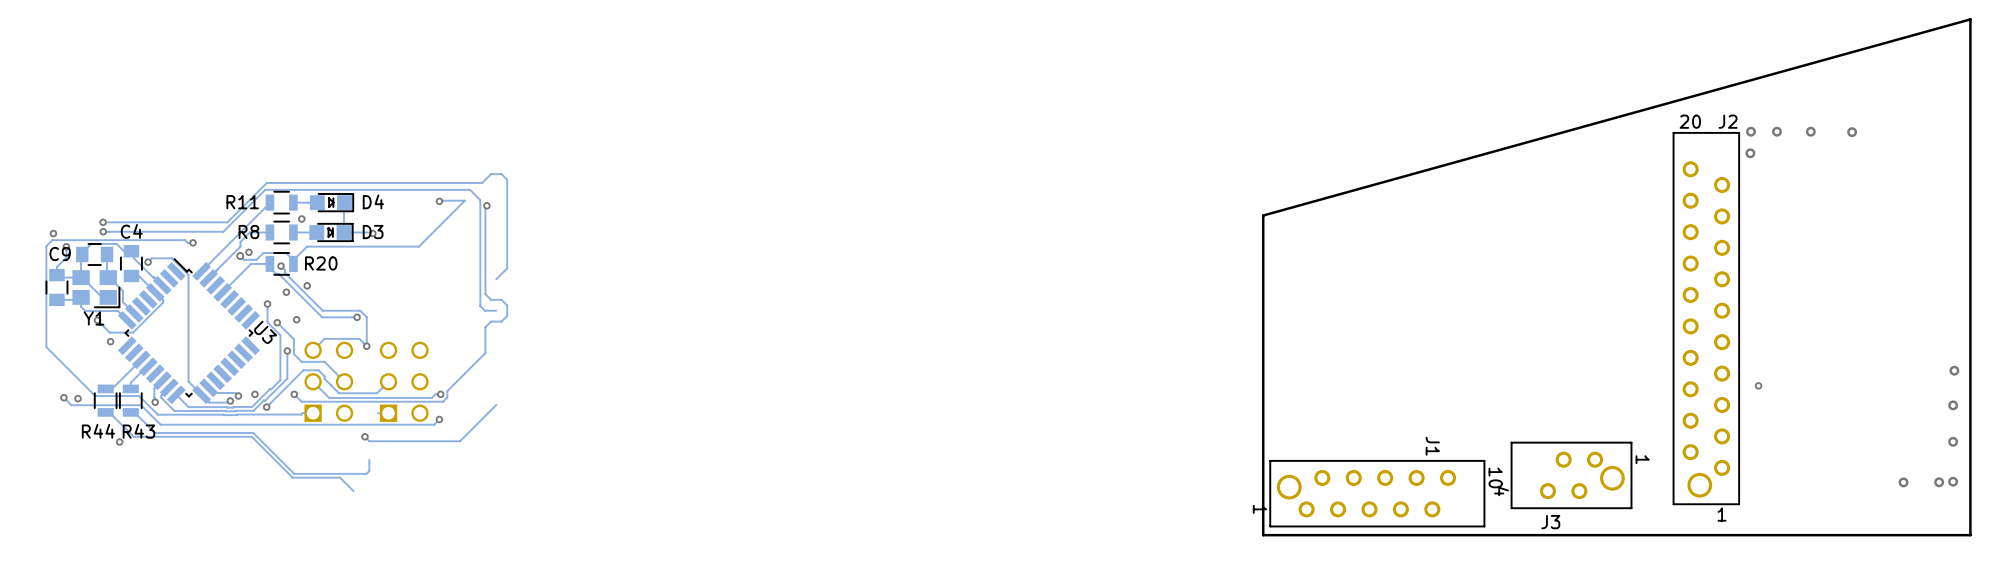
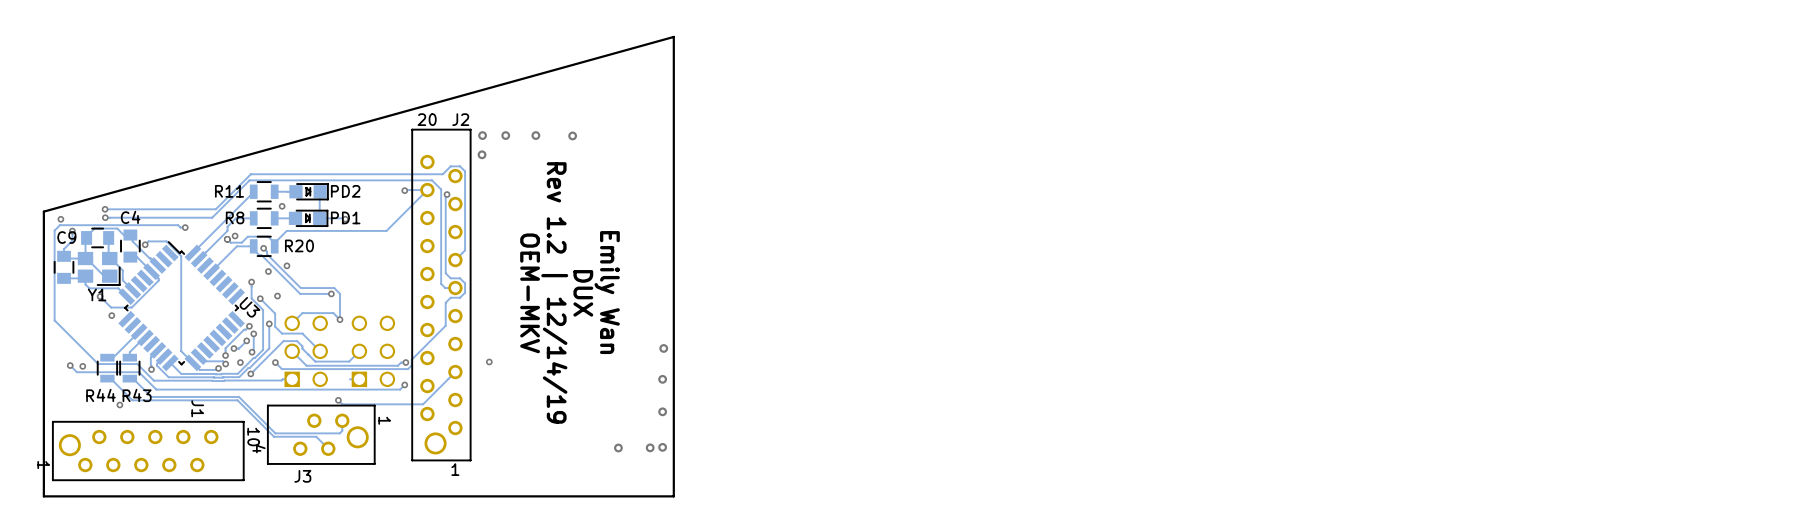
board edge: (1970, 19) (1263, 215) (1263, 535) (1970, 535) (1970, 19) -> none
board edge: none -> (673, 36) (43, 211) (43, 496) (673, 496) (673, 36)
via: (1750, 131) -> none
via: (1776, 131) -> none
via: (1810, 131) -> none
via: (1852, 132) -> none
via: none -> (482, 135)
via: none -> (505, 135)
via: none -> (535, 135)
via: none -> (572, 135)
via: (1750, 153) -> none
via: none -> (482, 154)
D4 name: D4 (373, 201) -> PD2 (345, 191)
D3 name: D3 (373, 232) -> PD1 (345, 217)
text: none -> Emily Wan (607, 292)
text: none -> OEM-MKV (530, 293)
text: none -> Rev 1.2 | 12/14/19 (554, 292)
text: none -> DUX (583, 293)
J2 position: (1706, 318) -> (441, 295)
track: none -> (249, 326) (225, 348) (225, 355)
via: none -> (249, 326)
track: none -> (253, 333) (253, 350) (252, 352)
via: none -> (253, 333)
track: none -> (246, 340) (239, 348) (233, 348)
via: none -> (246, 340)
via: (1954, 370) -> none
via: none -> (233, 348)
via: none -> (663, 348)
via: none -> (252, 352)
via: (1758, 385) -> none
via: none -> (225, 355)
via: none -> (489, 361)
via: (1953, 405) -> none
via: none -> (662, 379)
via: (1953, 441) -> none
via: none -> (662, 411)
J3 position: (1571, 475) -> (321, 434)
via: (1953, 481) -> none
via: (1903, 482) -> none
via: (1939, 482) -> none
via: none -> (662, 447)
via: none -> (618, 447)
via: none -> (650, 447)
J1 position: (1377, 493) -> (148, 451)

